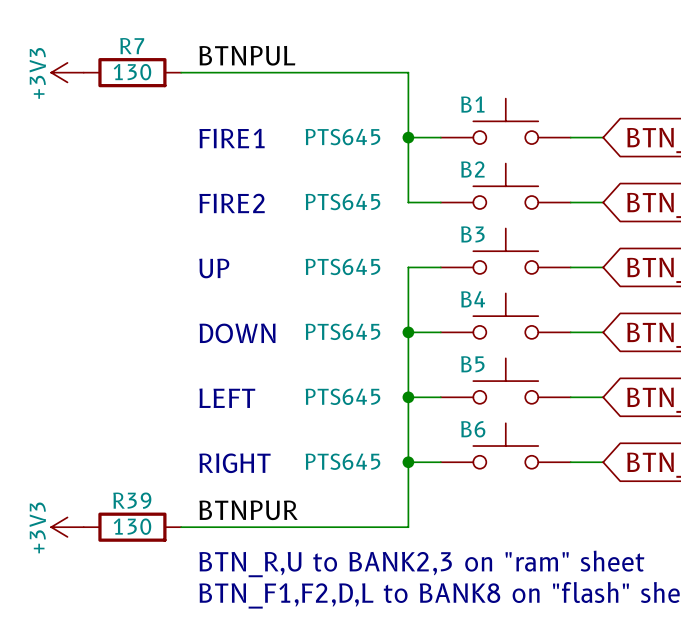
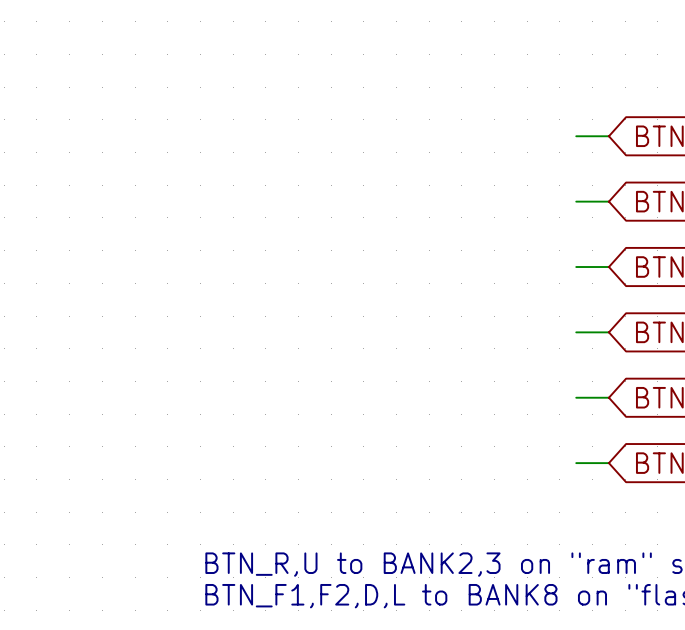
label: BTNPUL (247, 55) -> none
power symbol: +3V3 (67, 72) -> none
R7: 130 (132, 72) -> none
wire: (181, 72) (408, 72) (408, 202) (440, 202) -> none
B1: PTS645 (505, 121) -> none
wire: (408, 137) (440, 137) -> none
junction: (408, 137) -> none
text: FIRE1 (232, 138) -> none
B2: PTS645 (505, 186) -> none
text: FIRE2 (232, 203) -> none
B3: PTS645 (505, 251) -> none
wire: (440, 267) (408, 267) (408, 527) (181, 527) -> none
text: UP (214, 268) -> none
B4: PTS645 (505, 316) -> none
wire: (408, 332) (440, 332) -> none
junction: (408, 332) -> none
text: DOWN (237, 333) -> none
B5: PTS645 (505, 381) -> none
wire: (408, 397) (440, 397) -> none
junction: (408, 397) -> none
text: LEFT (227, 398) -> none
B6: PTS645 (505, 446) -> none
wire: (408, 462) (440, 462) -> none
junction: (408, 462) -> none
text: RIGHT (234, 463) -> none
label: BTNPUR (248, 510) -> none
power symbol: +3V3 (67, 527) -> none
R39: 130 (132, 527) -> none

